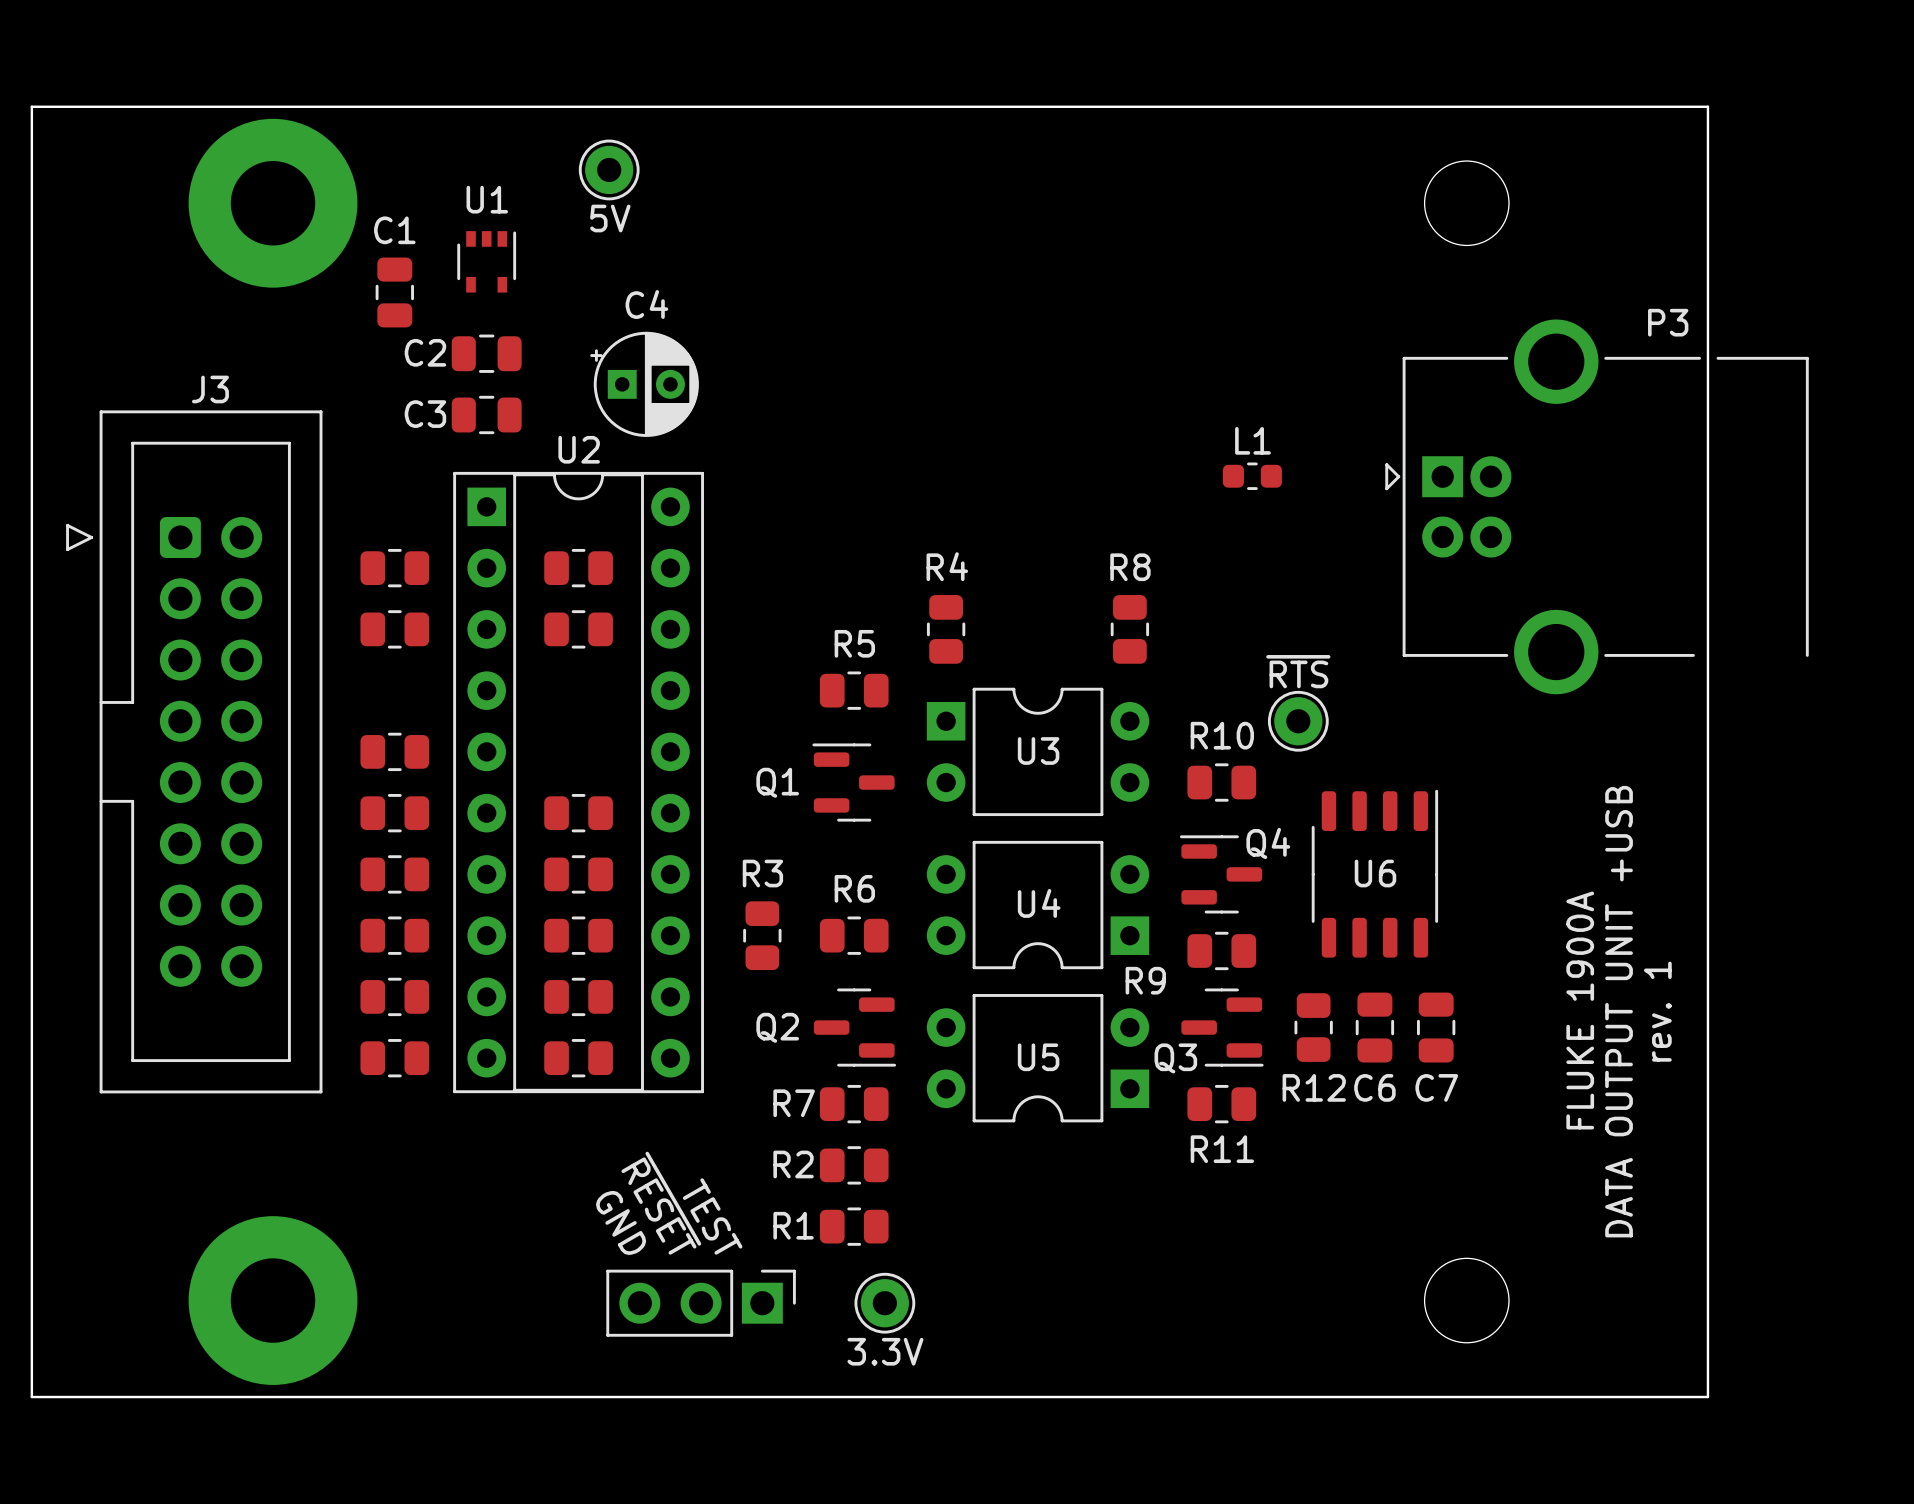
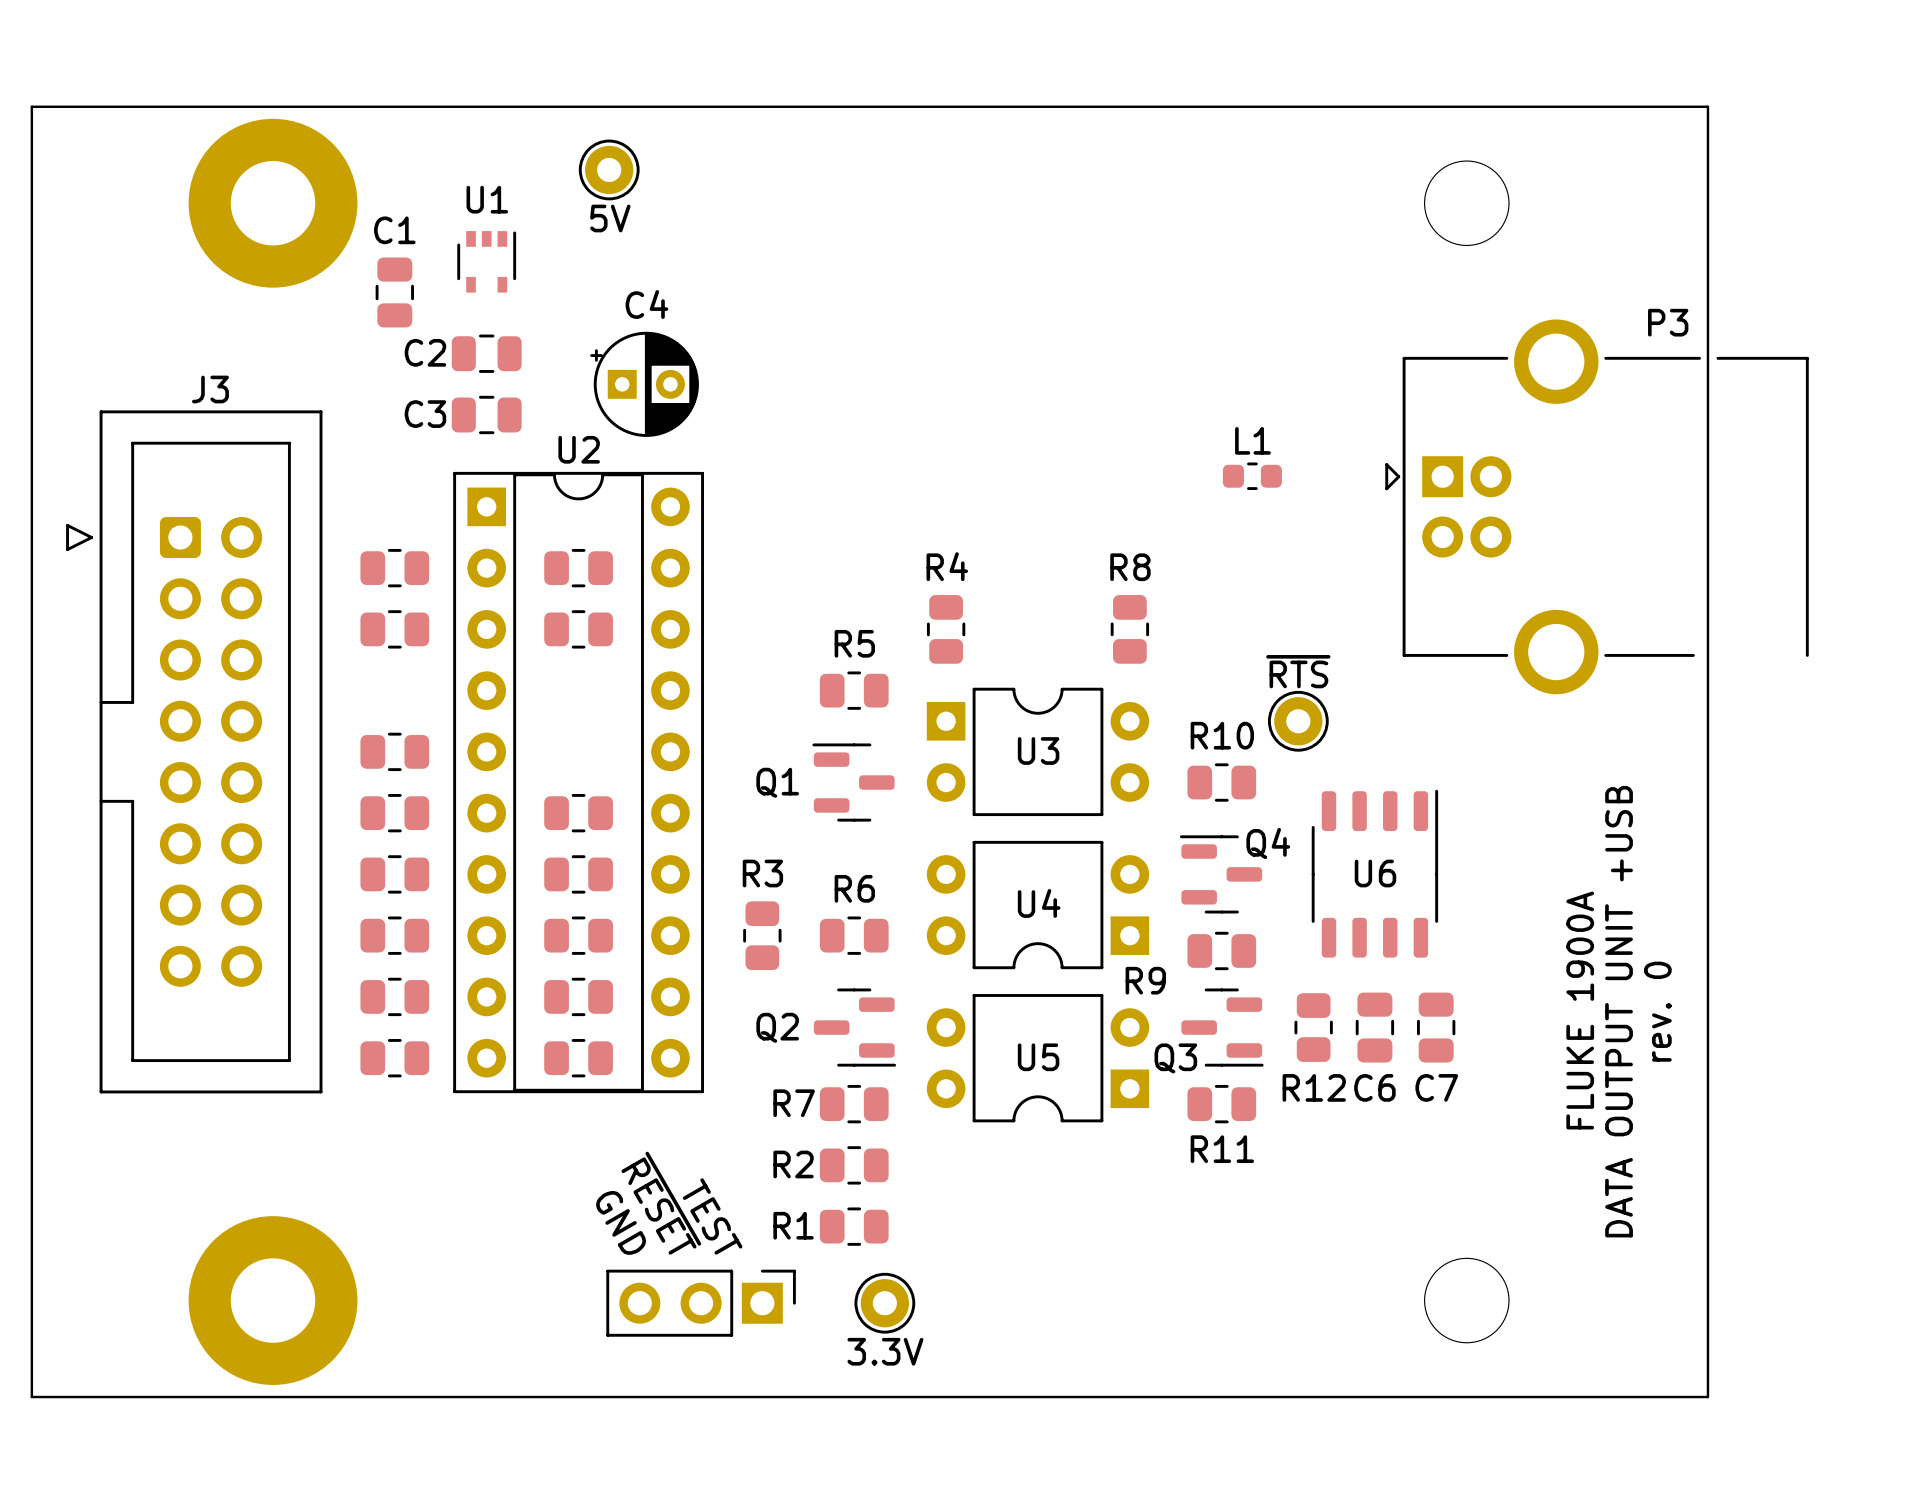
text: rev. 1 (1657, 1011) -> rev. 0 (1657, 1011)

